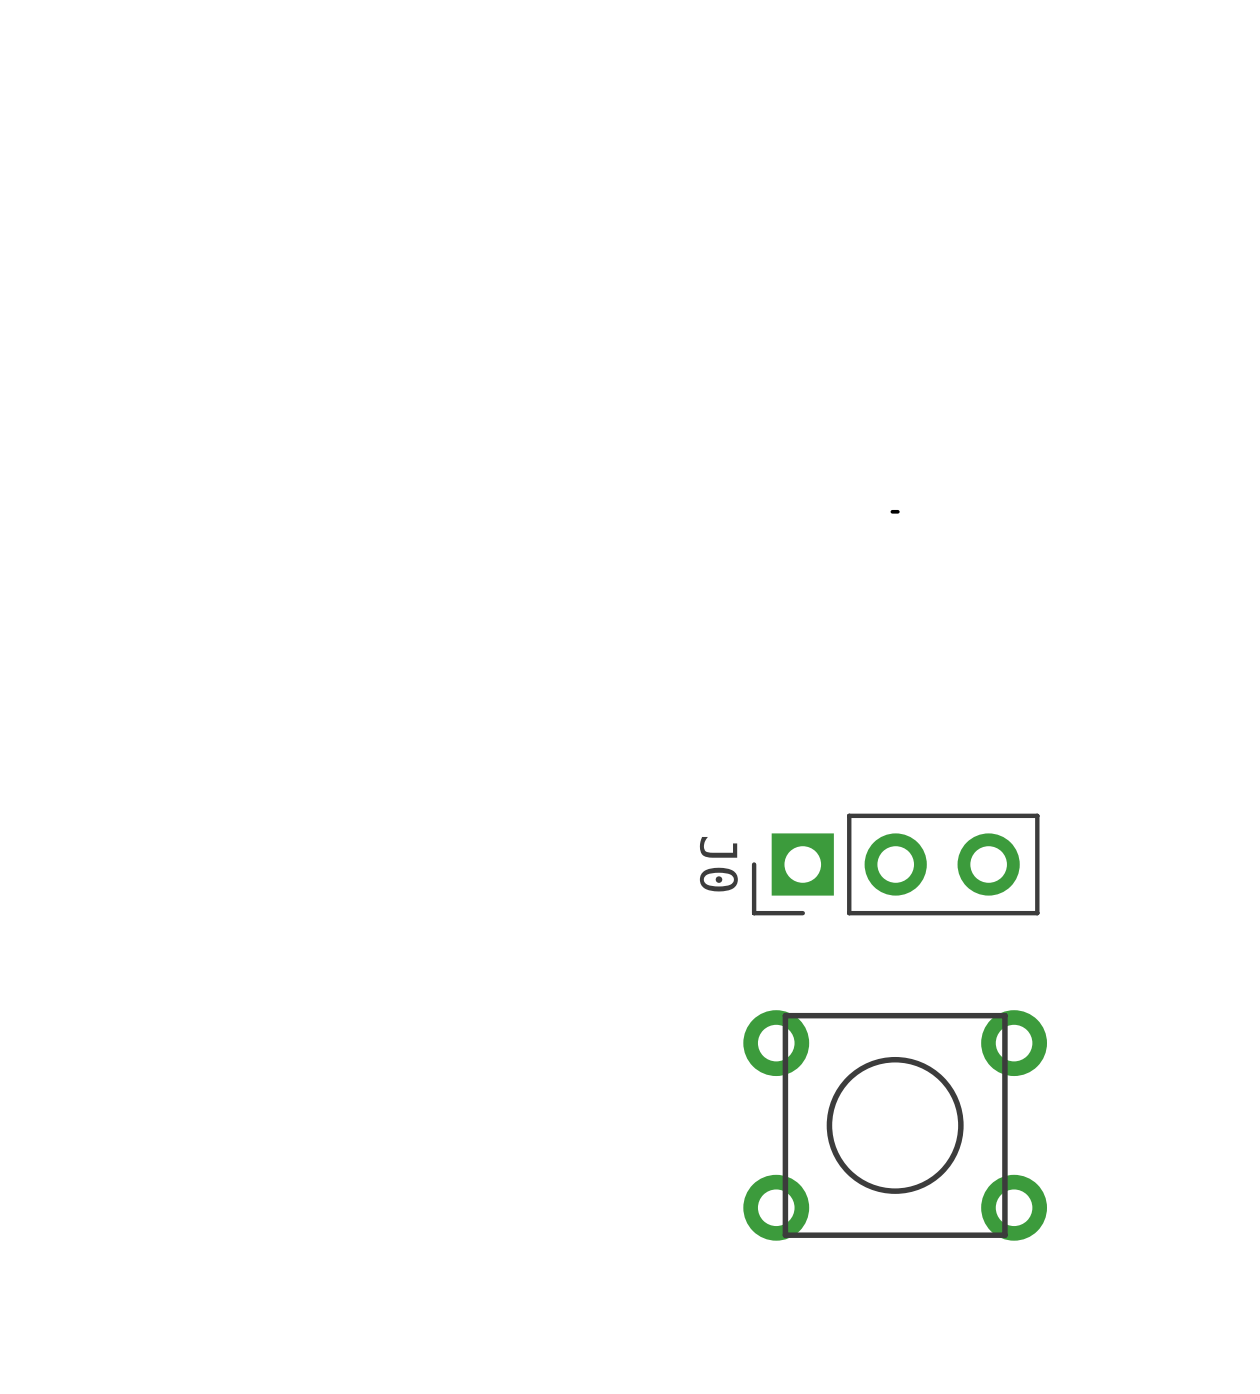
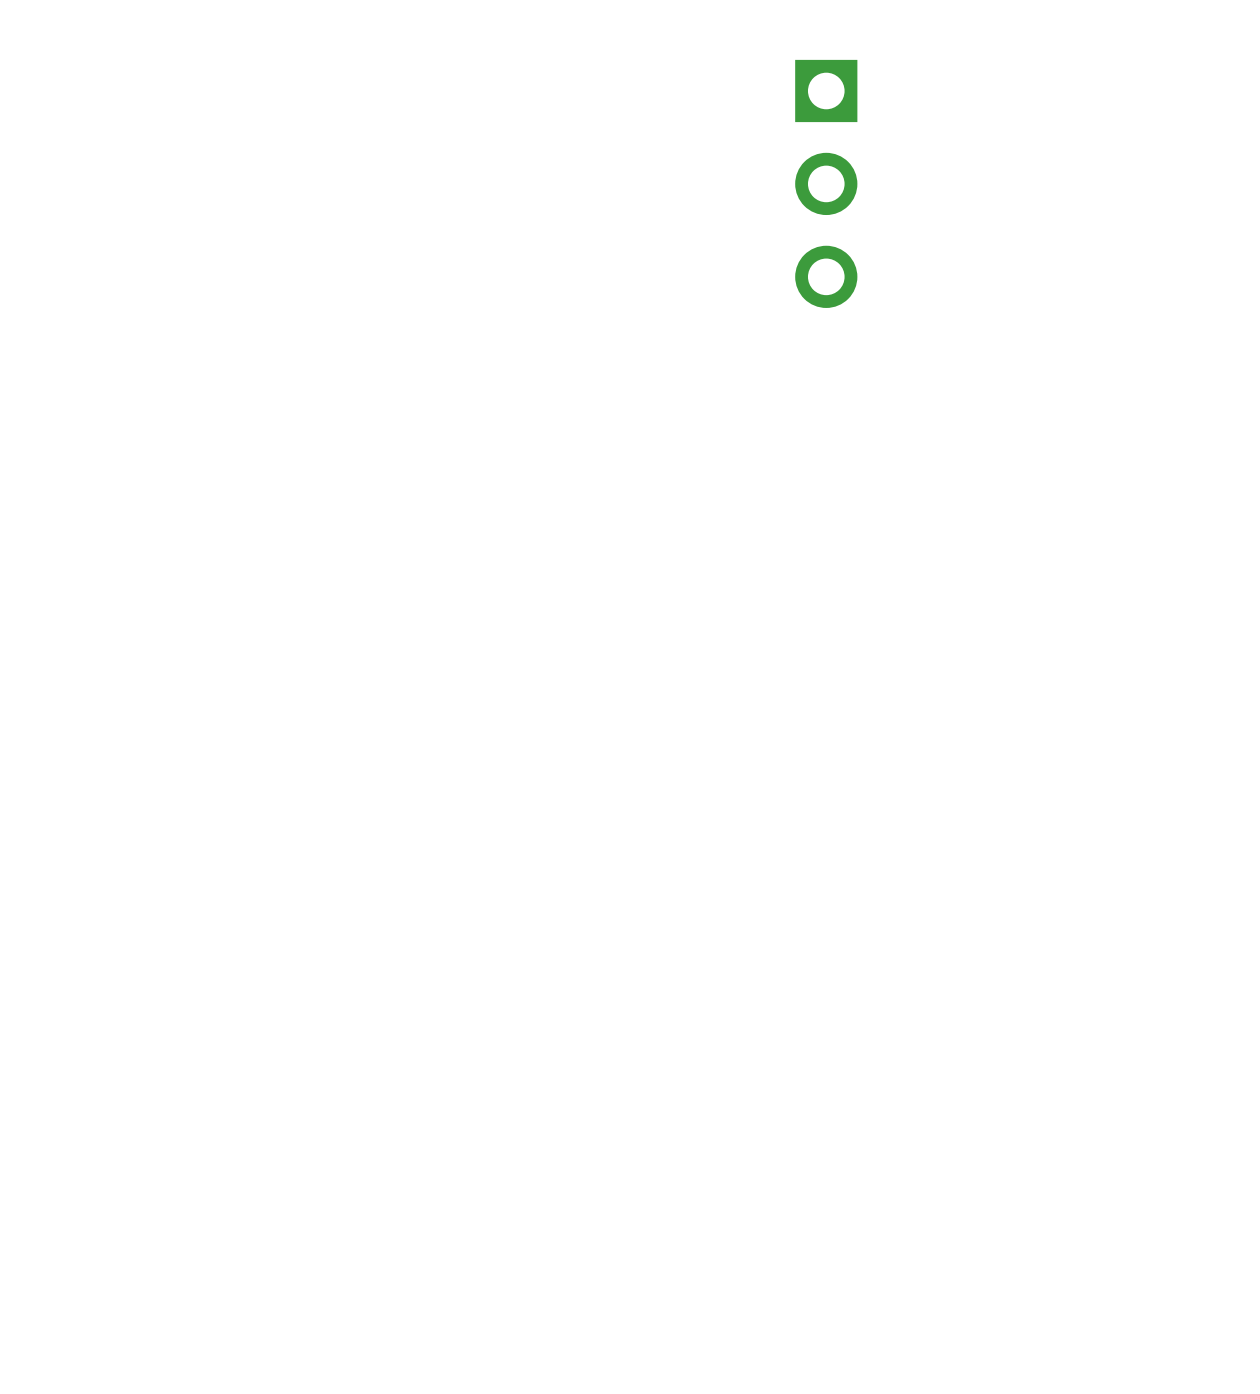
board edge: (897, 511) (892, 511) -> none
J0 side: bottom (895, 864) -> top (826, 183)
part: (895, 1125) -> none

